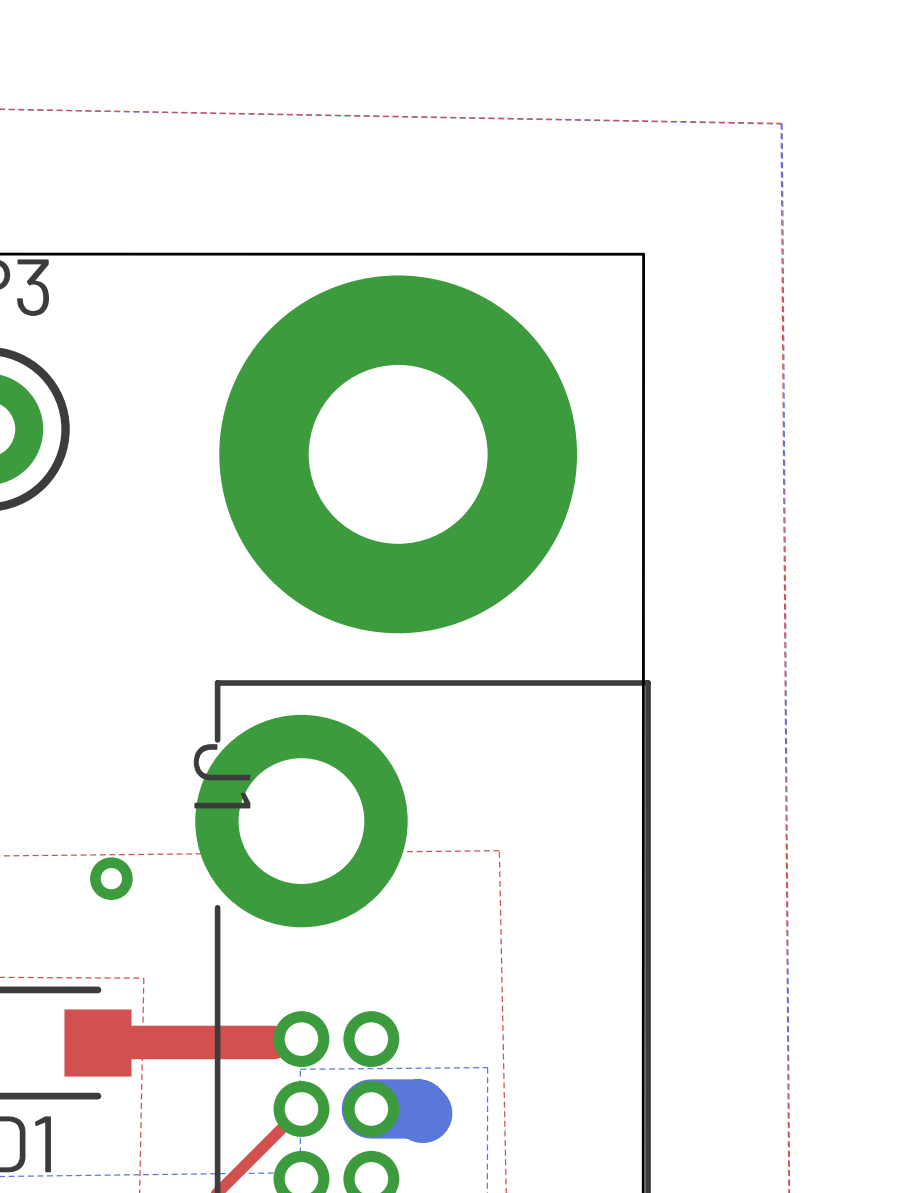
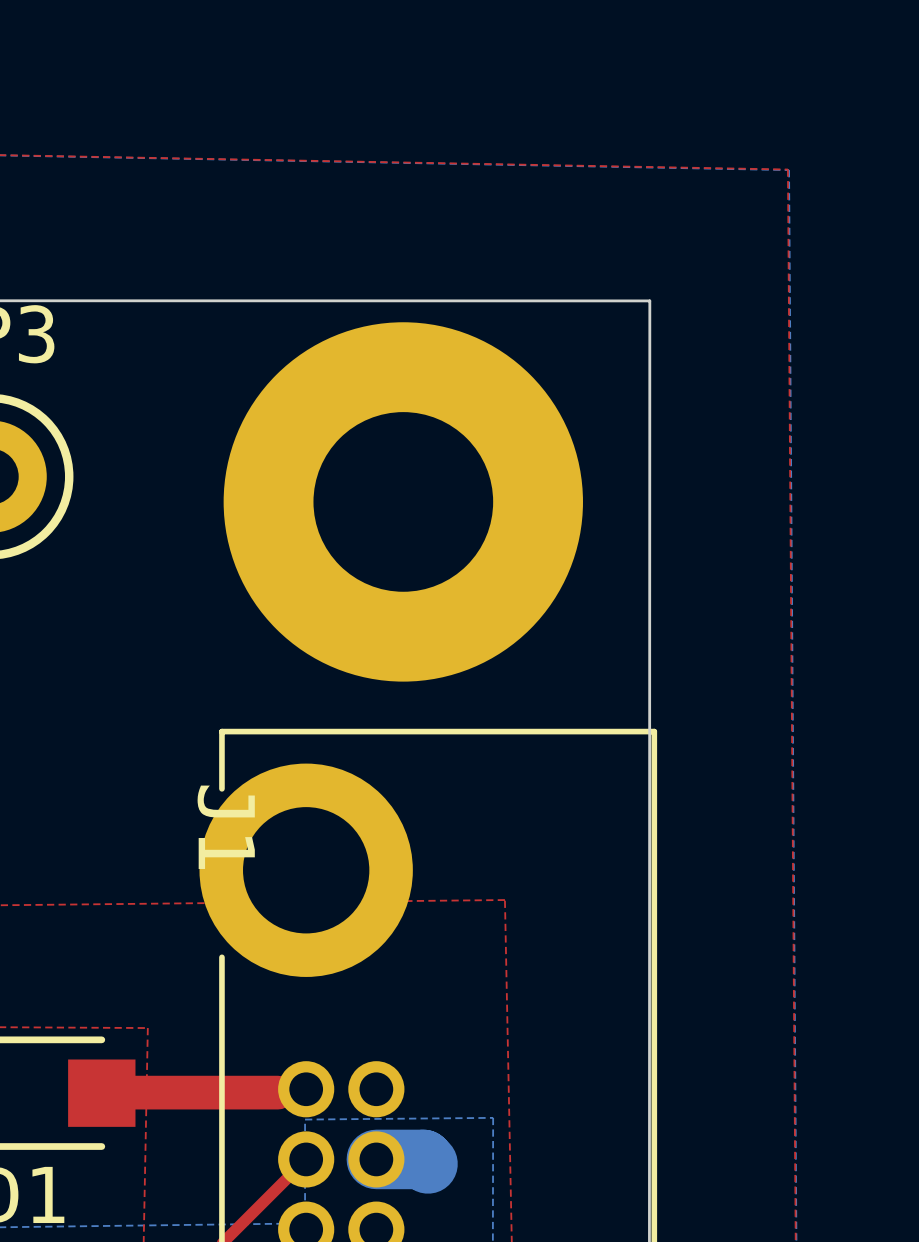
via: (111, 878) -> none

